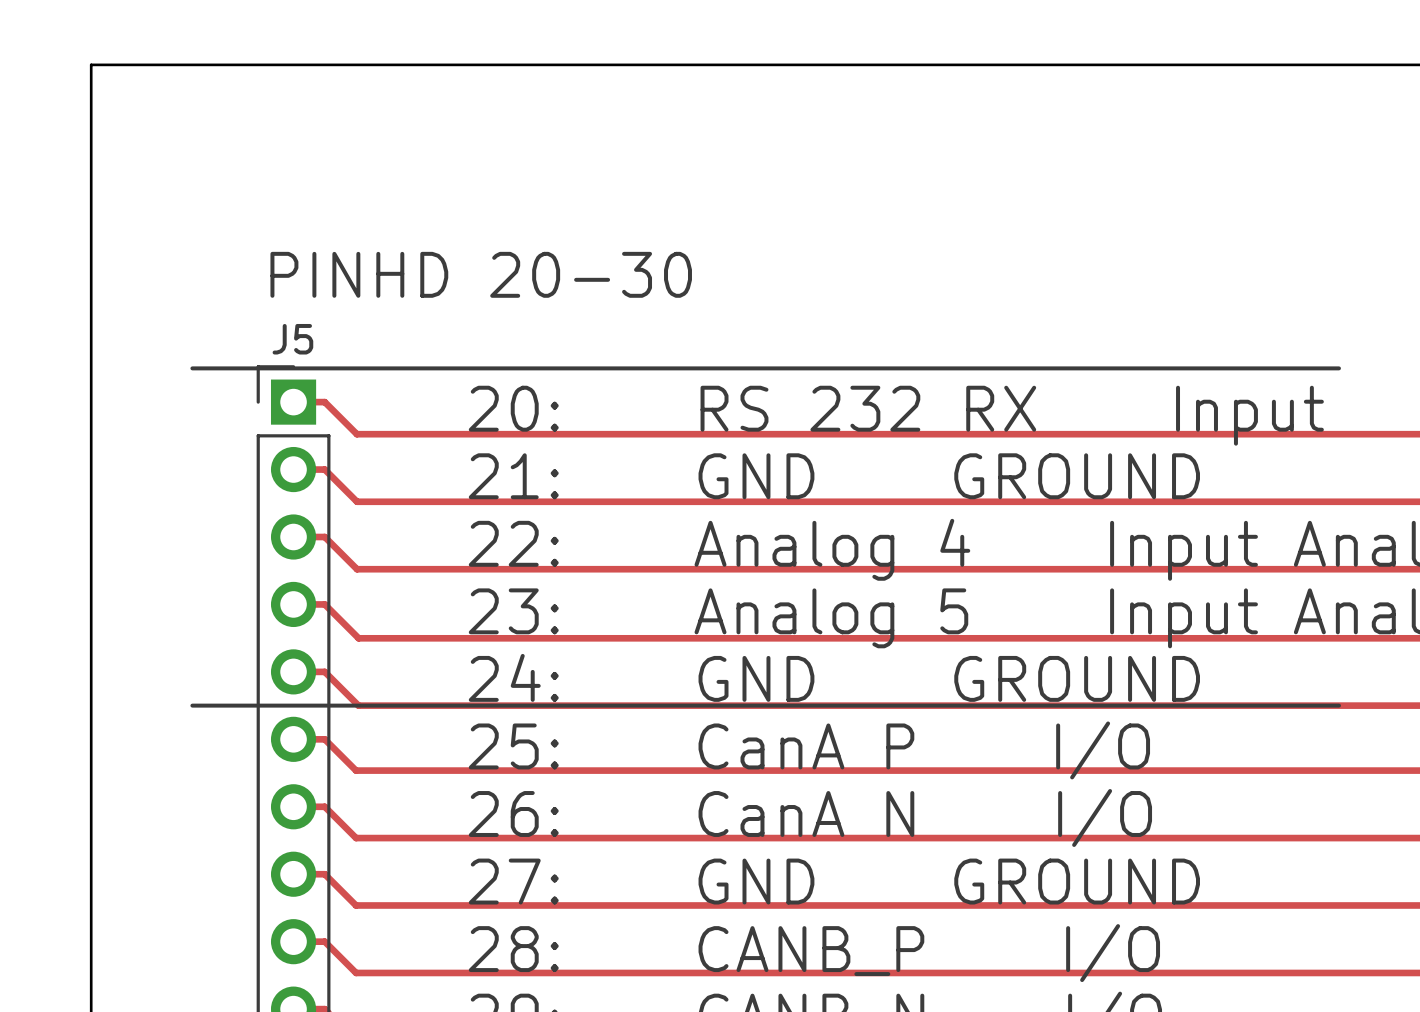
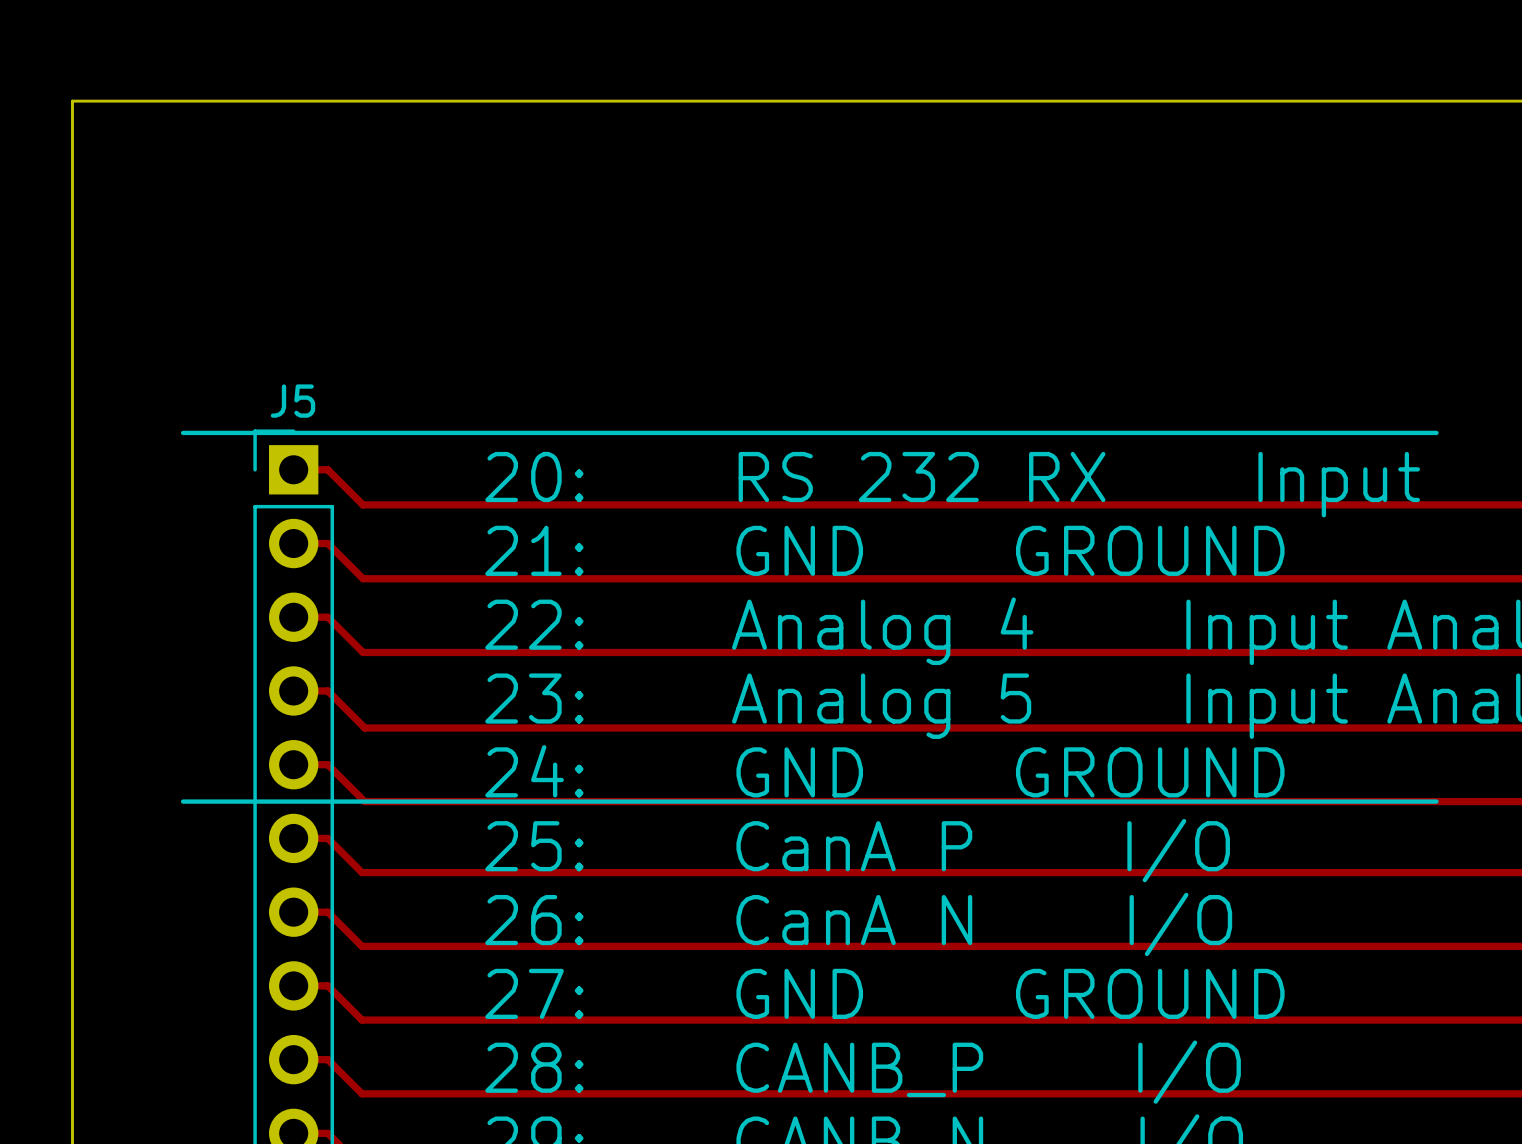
text: PINHD 20-30 (481, 274) -> none

